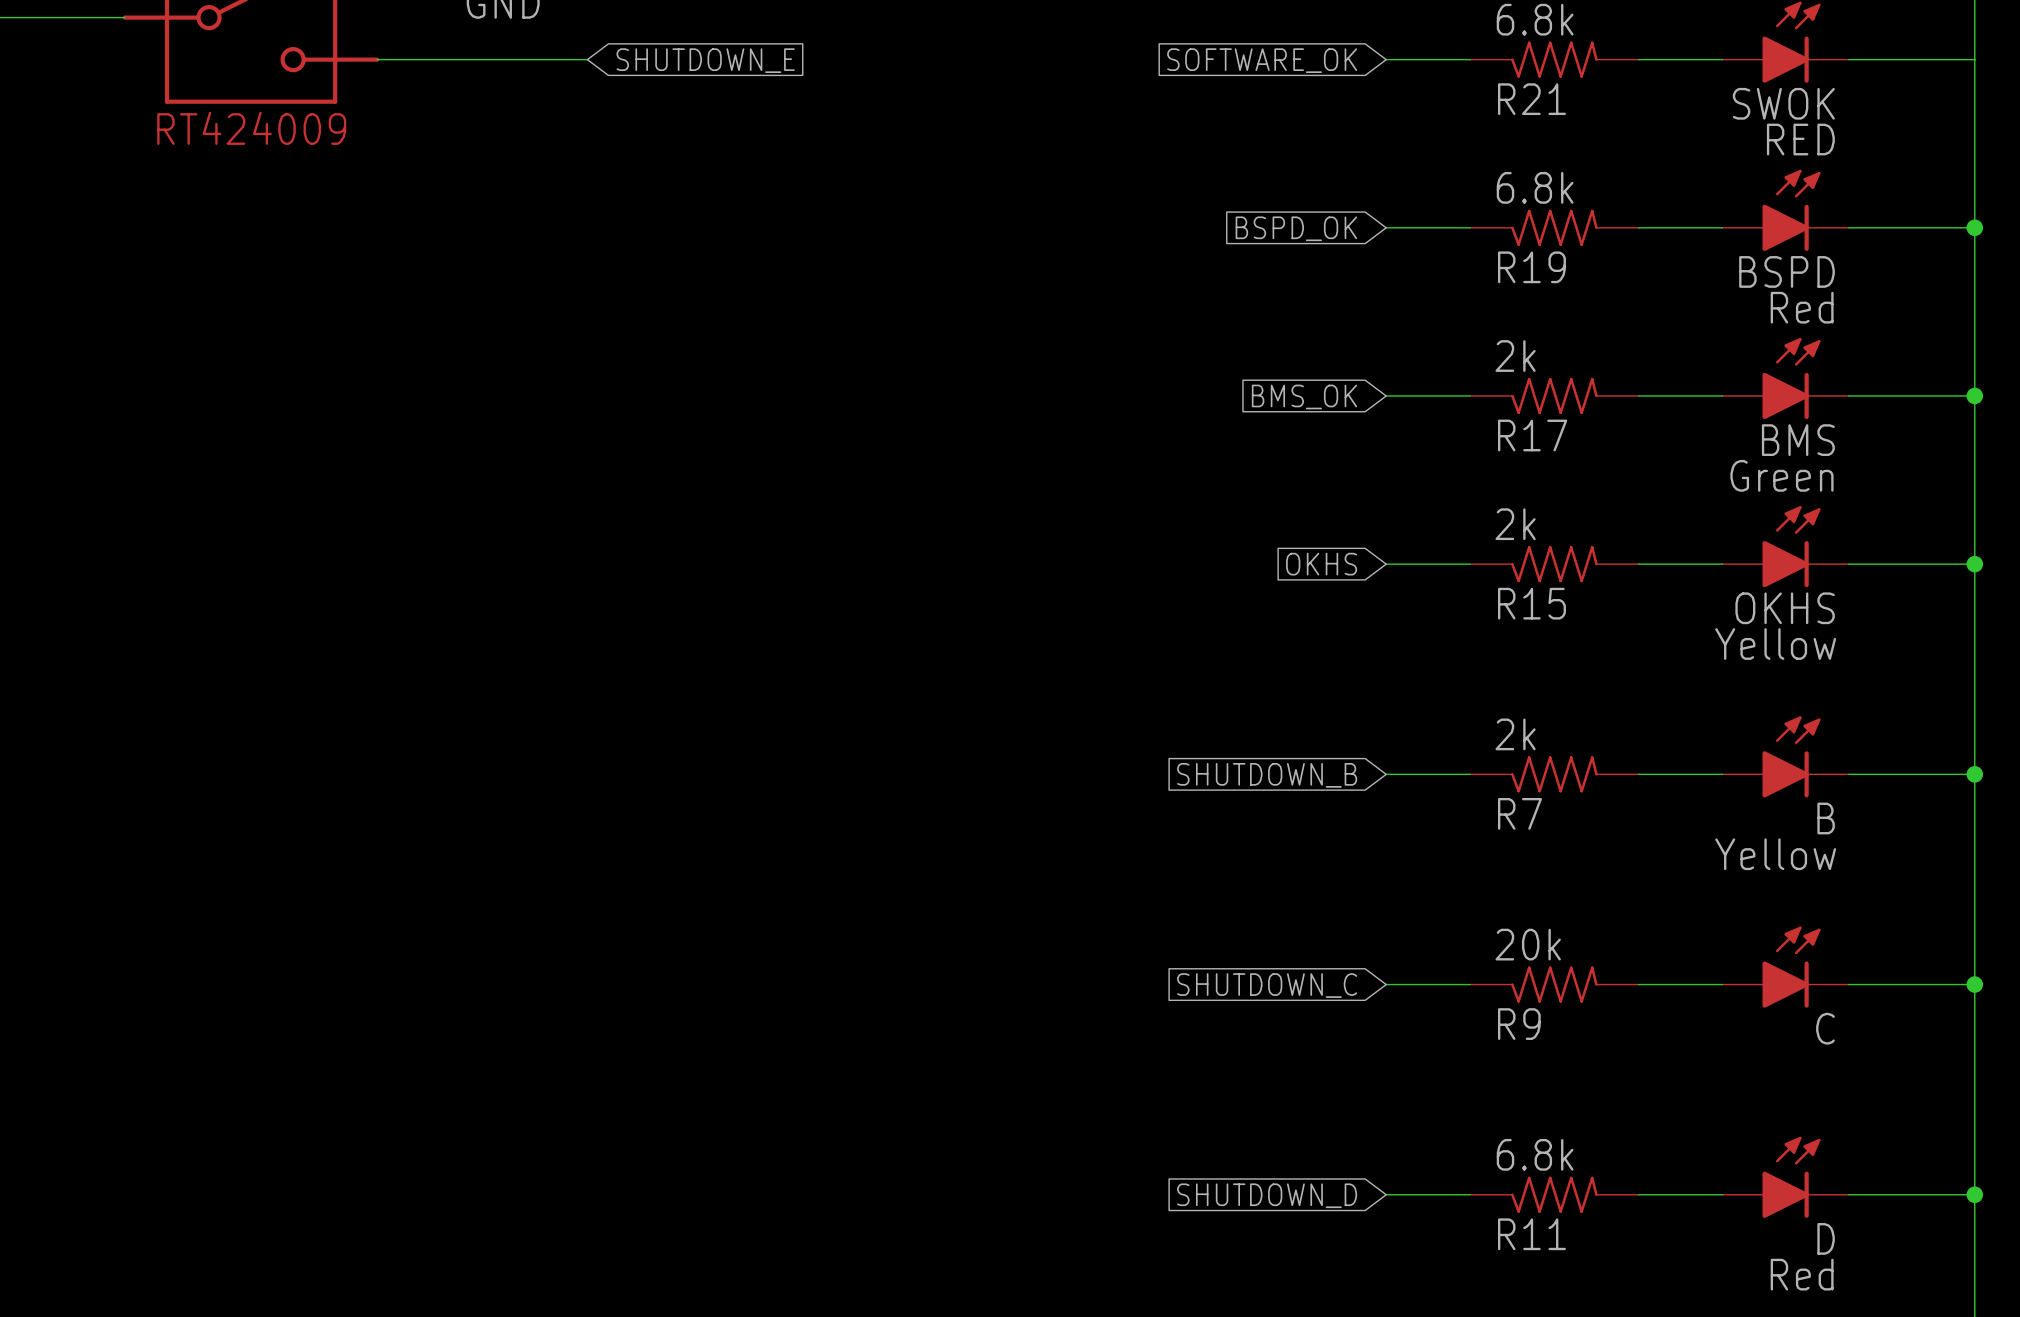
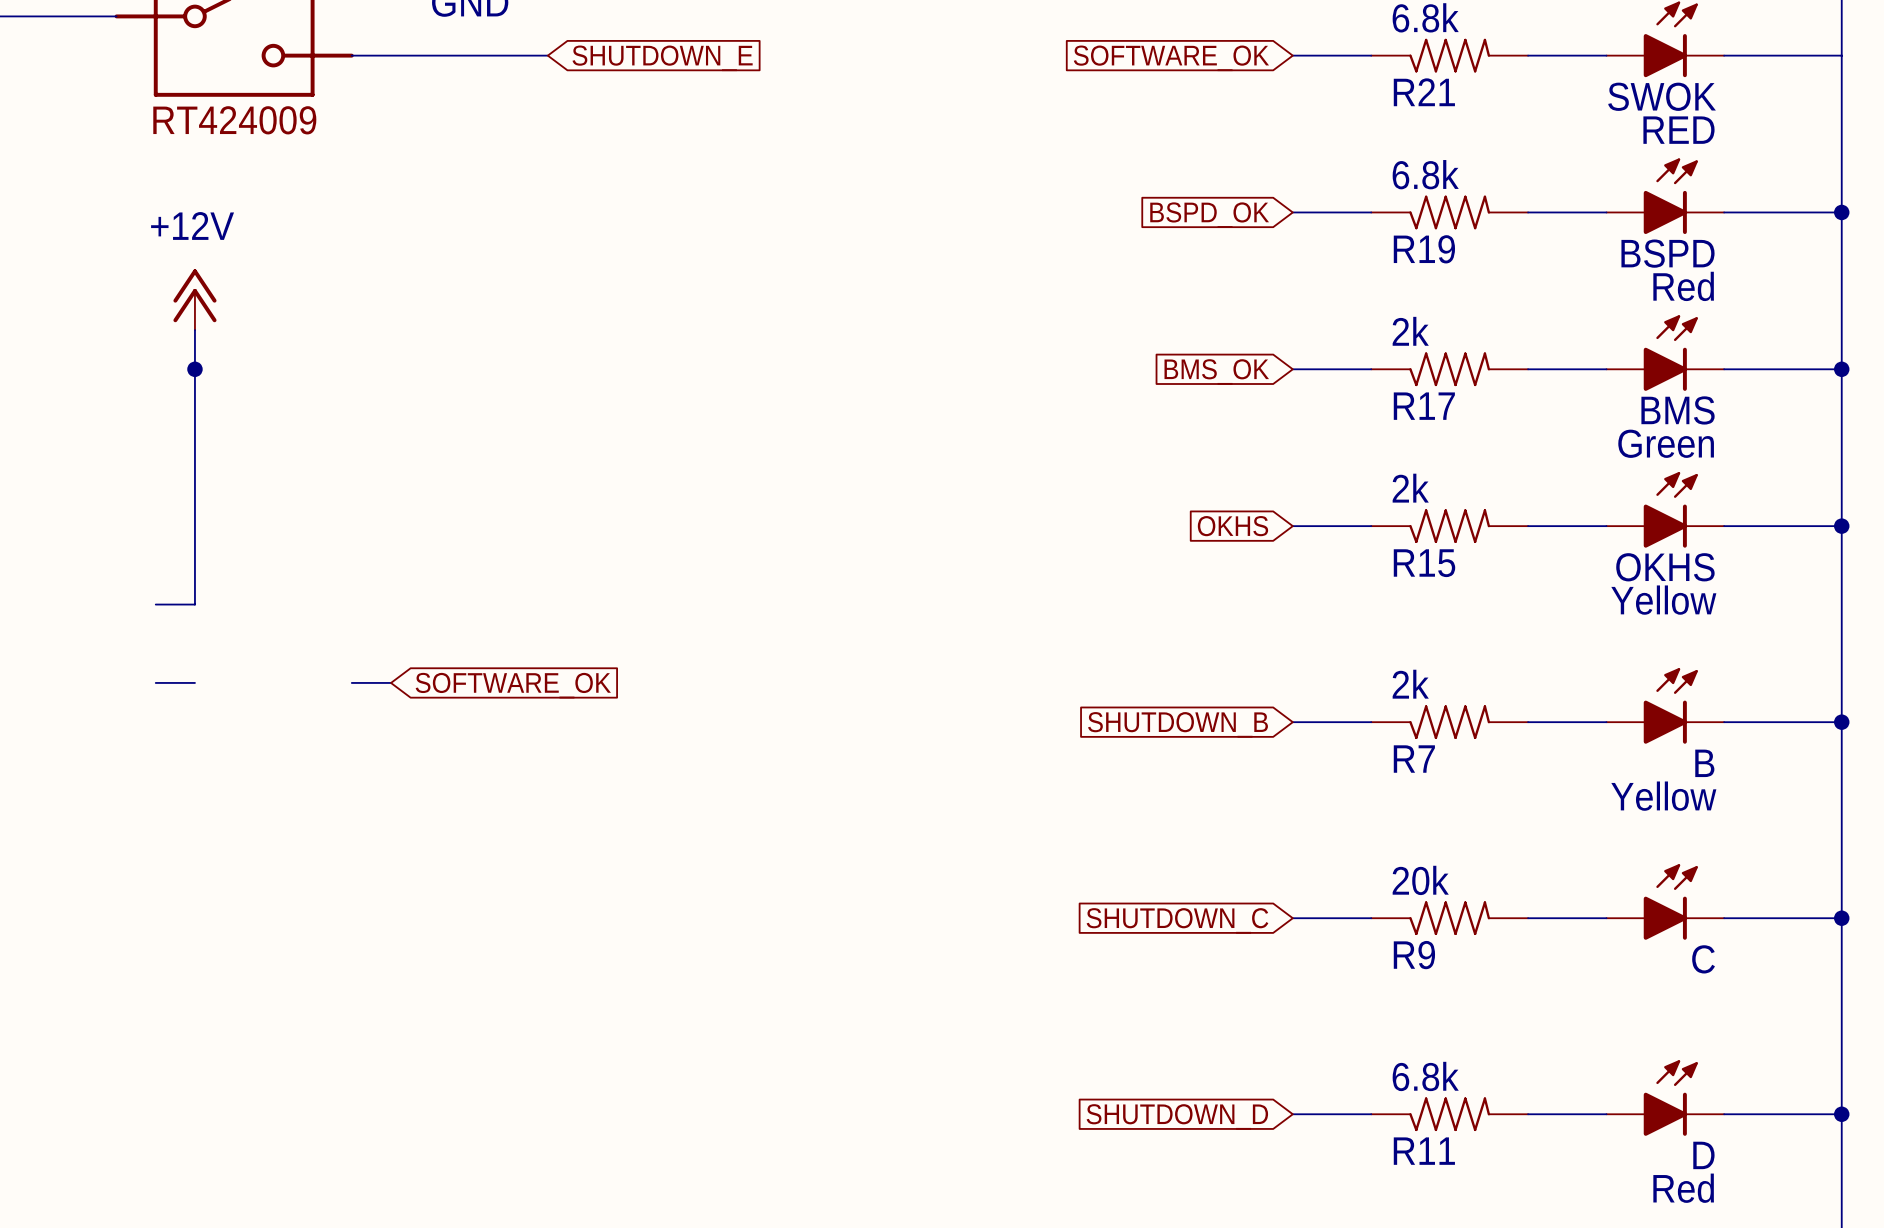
power symbol: none -> +12V (194, 299)
wire: none -> (194, 330) (194, 604) (155, 604)
junction: none -> (194, 369)
wire: none -> (155, 682) (194, 682)
wire: none -> (351, 682) (391, 682)
global label: none -> SOFTWARE_OK (513, 685)

